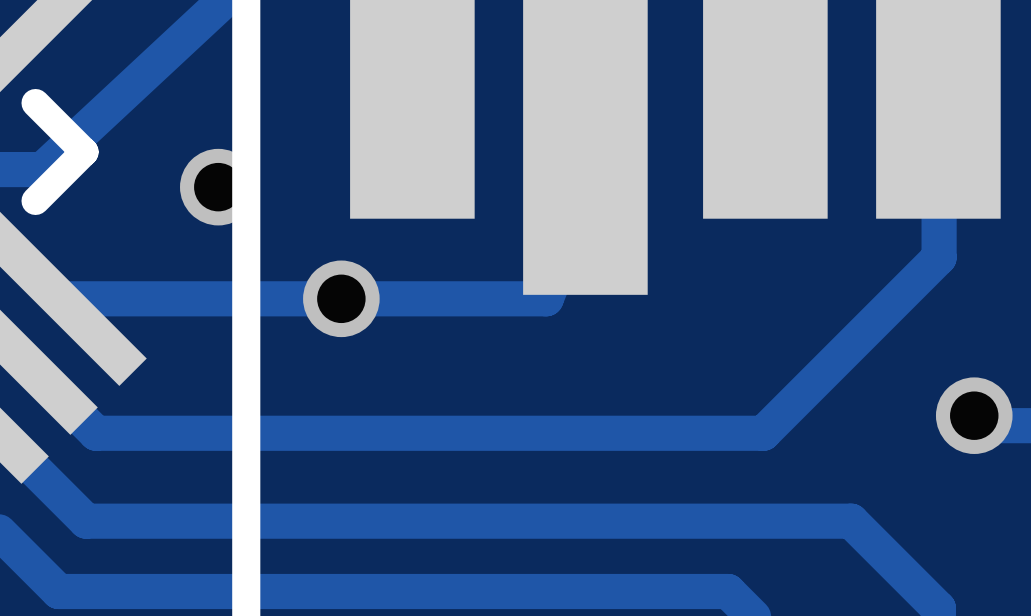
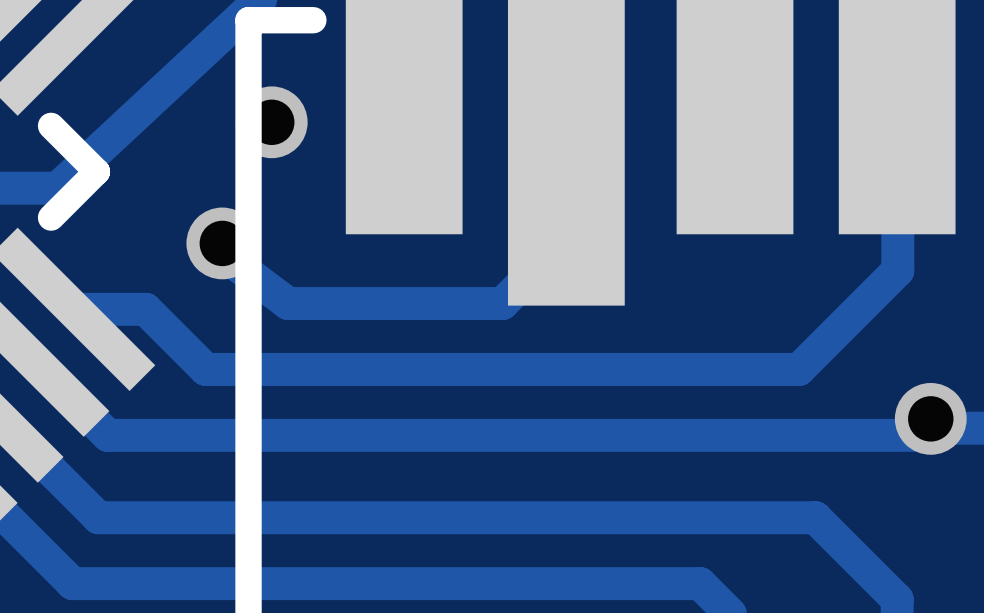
via: none -> (271, 122)
via position: (218, 187) -> (222, 243)
track: (569, 239) (546, 298) (136, 298) -> (551, 254) (502, 303) (288, 303) (222, 254) (222, 243)
track: none -> (145, 309) (205, 369) (798, 369)
via: (341, 298) -> none
track: (833, 362) (763, 433) -> (940, 428) (932, 435) (733, 435)

